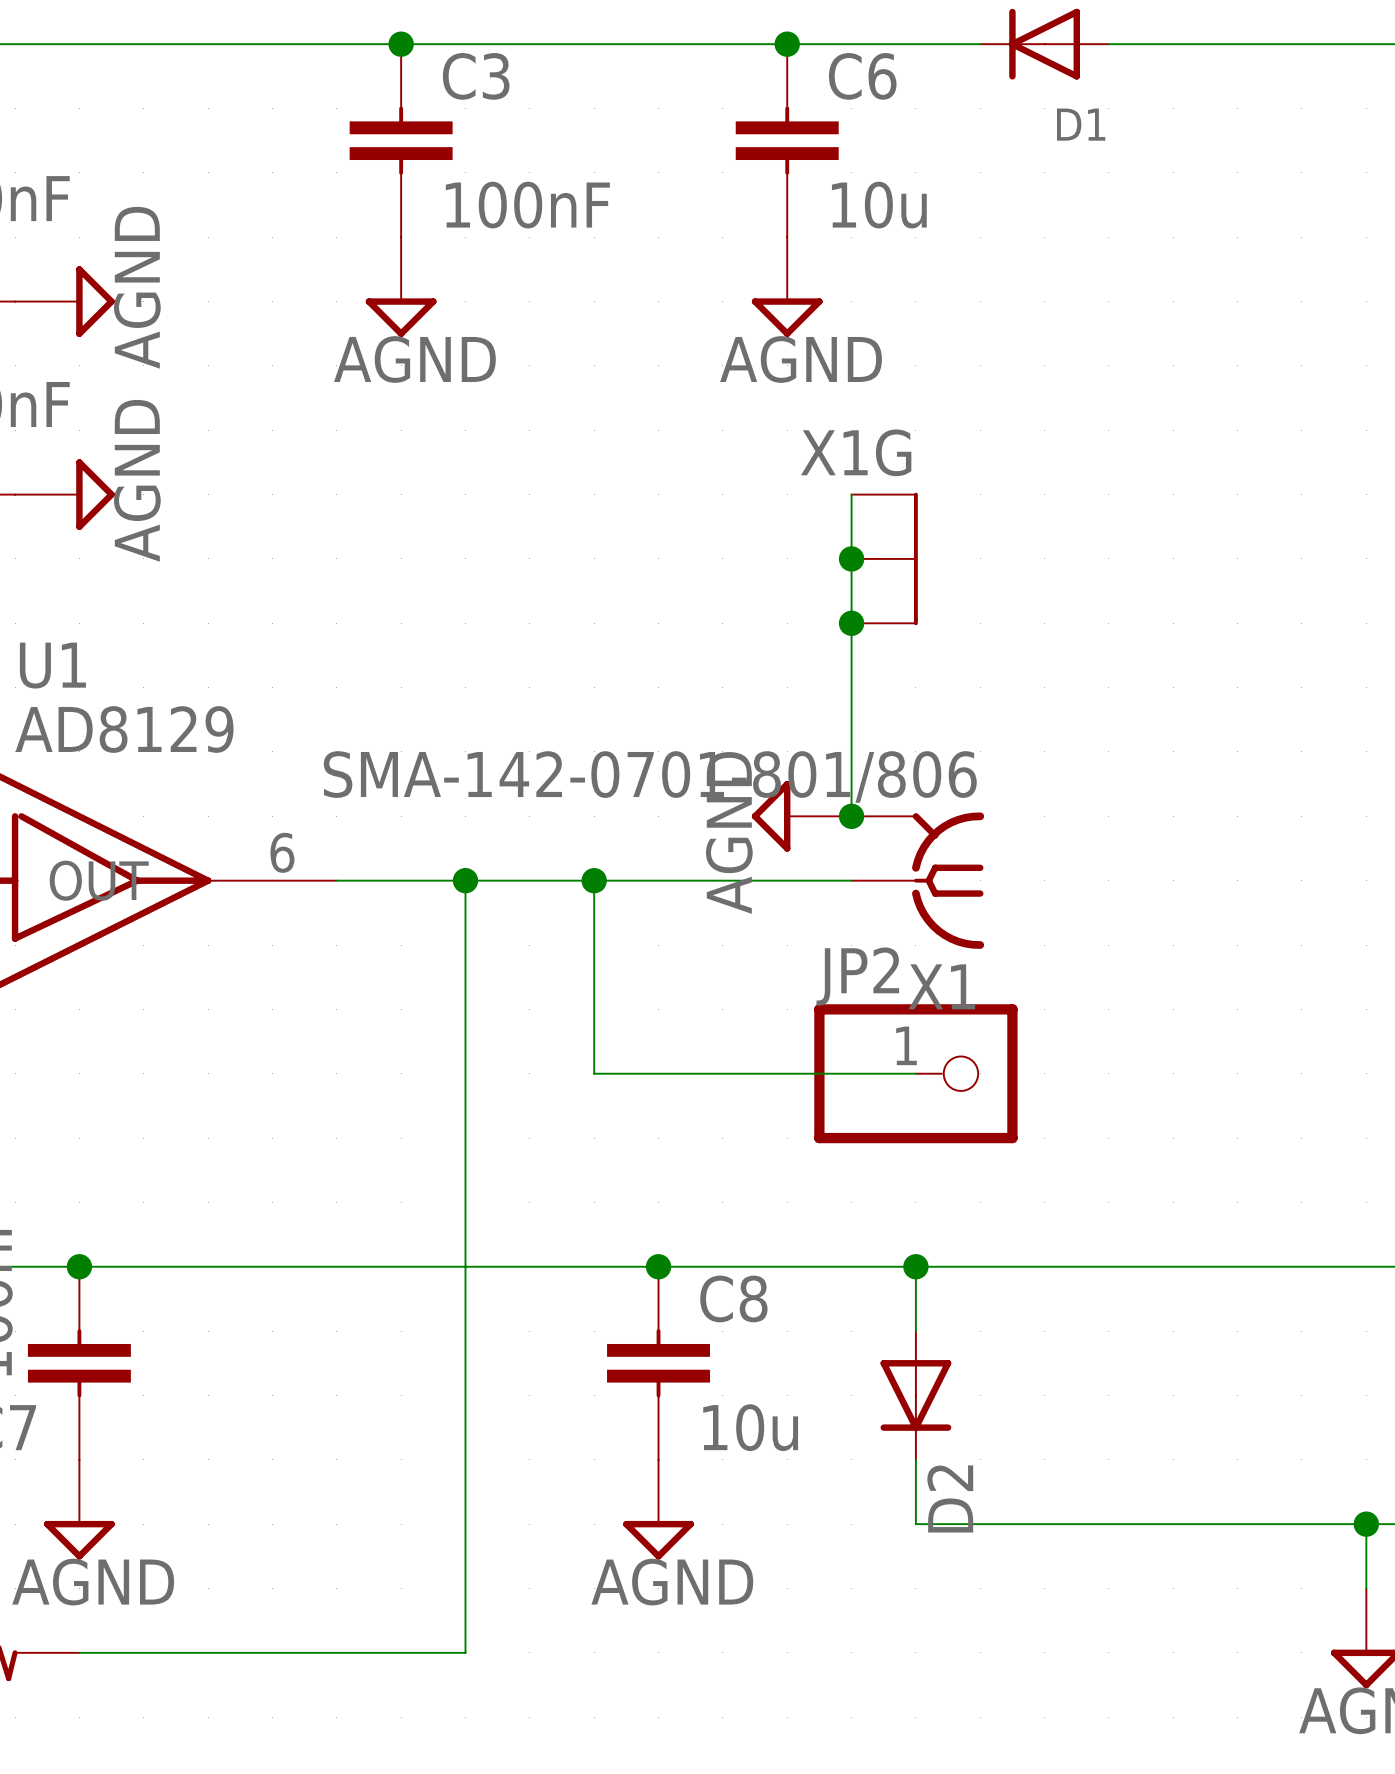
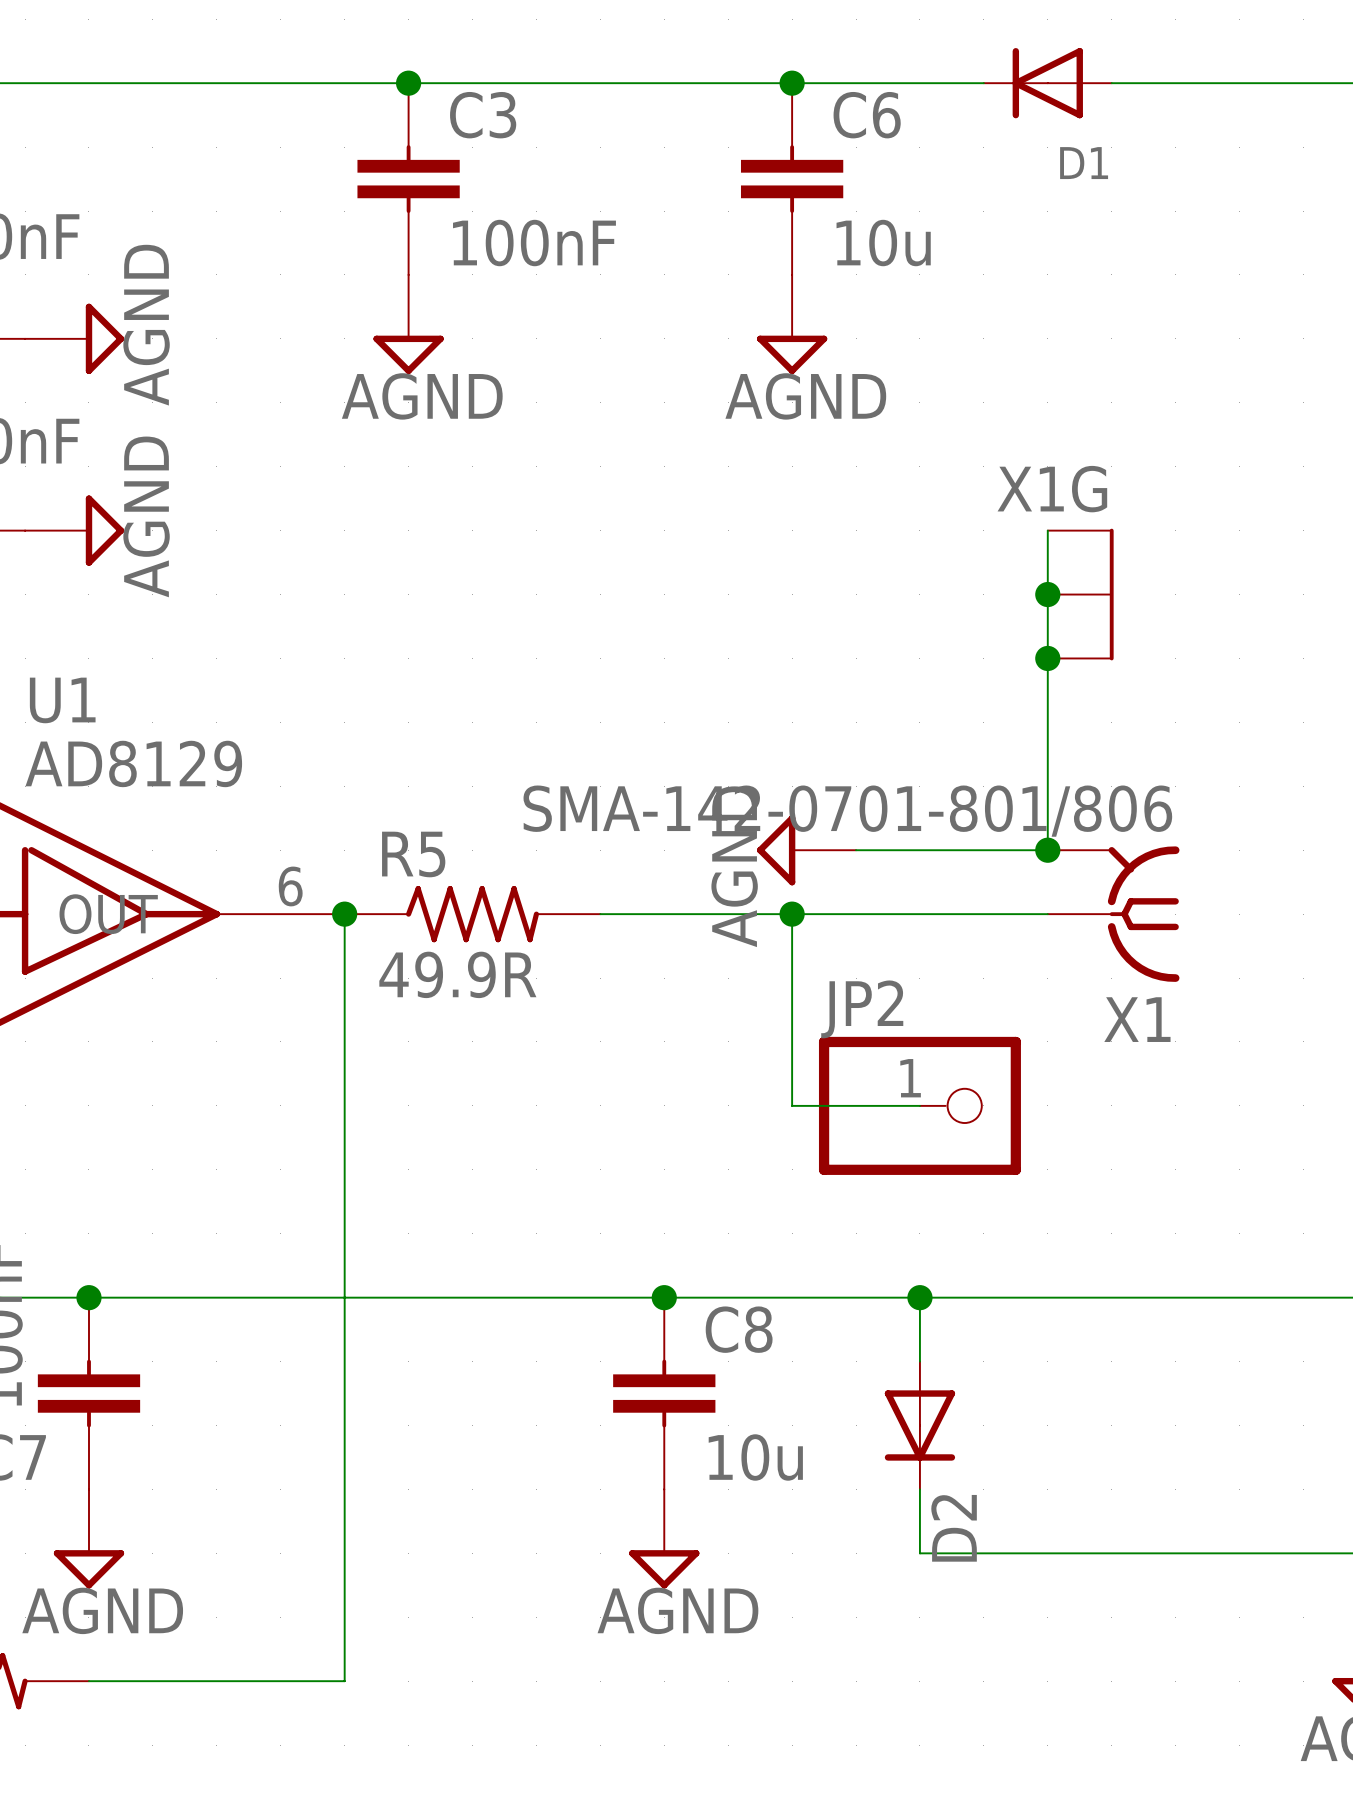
wire: (851, 494) (851, 816) -> (1047, 530) (1047, 850) (856, 850)
junction: (851, 558) -> none
X1G position: (884, 558) -> (1080, 594)
junction: none -> (1047, 594)
junction: (851, 623) -> none
junction: none -> (1047, 658)
junction position: (851, 816) -> (792, 914)
junction: none -> (1047, 850)
wire: (336, 880) (594, 880) (594, 1073) (787, 1073) -> (792, 914) (792, 1105)
junction: none -> (344, 914)
wire: (465, 880) (465, 1652) (336, 1652) -> (344, 914) (344, 1681)
R5: none -> 49.9R (472, 914)
junction: (465, 880) -> none
junction: (594, 880) -> none
wire: none -> (856, 914) (1047, 914)
X1 position: (917, 880) -> (1113, 914)

